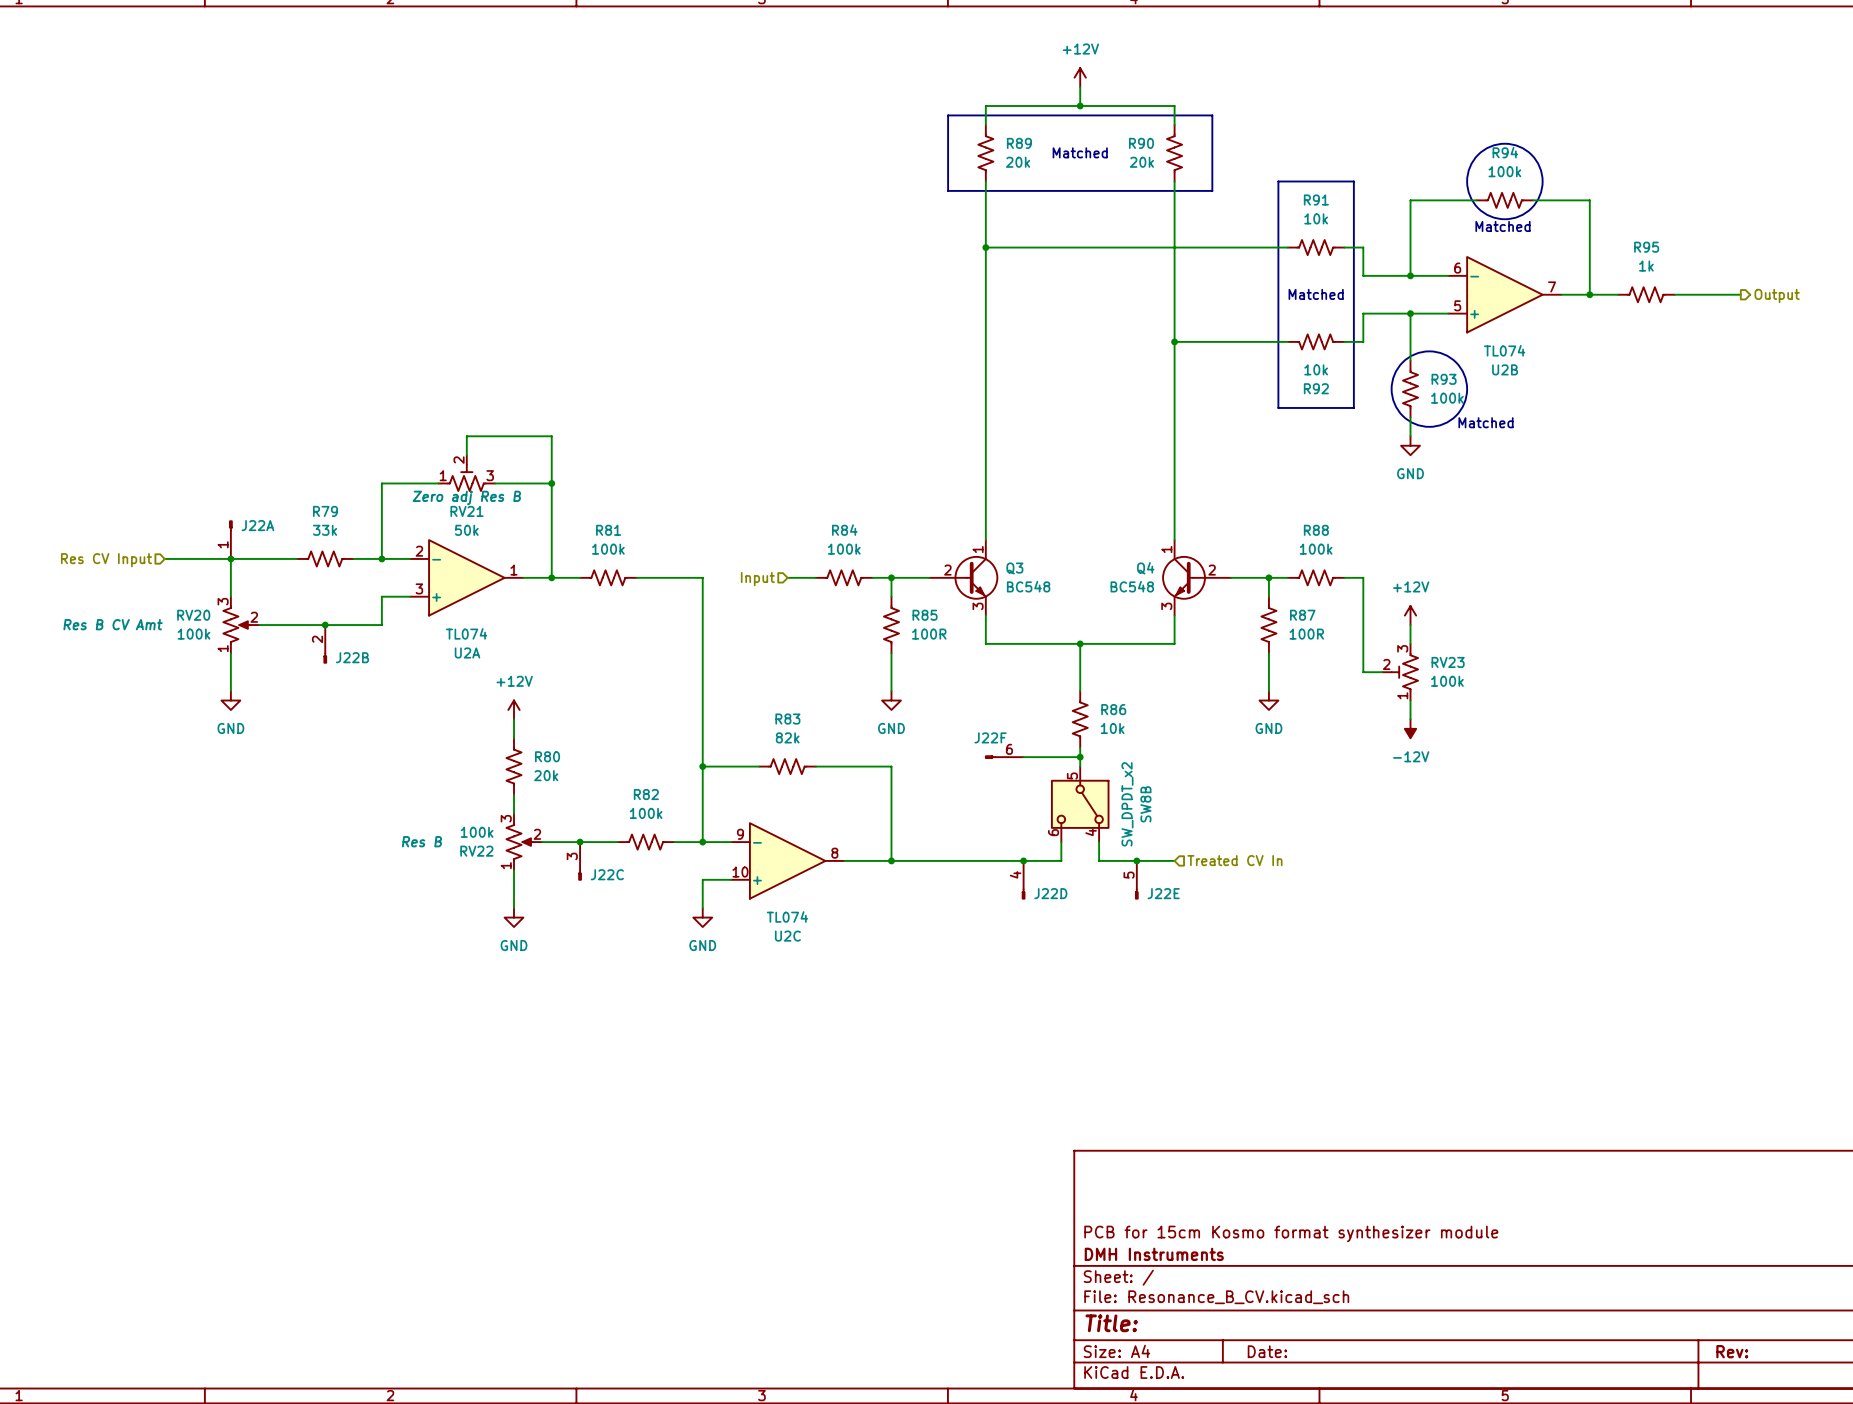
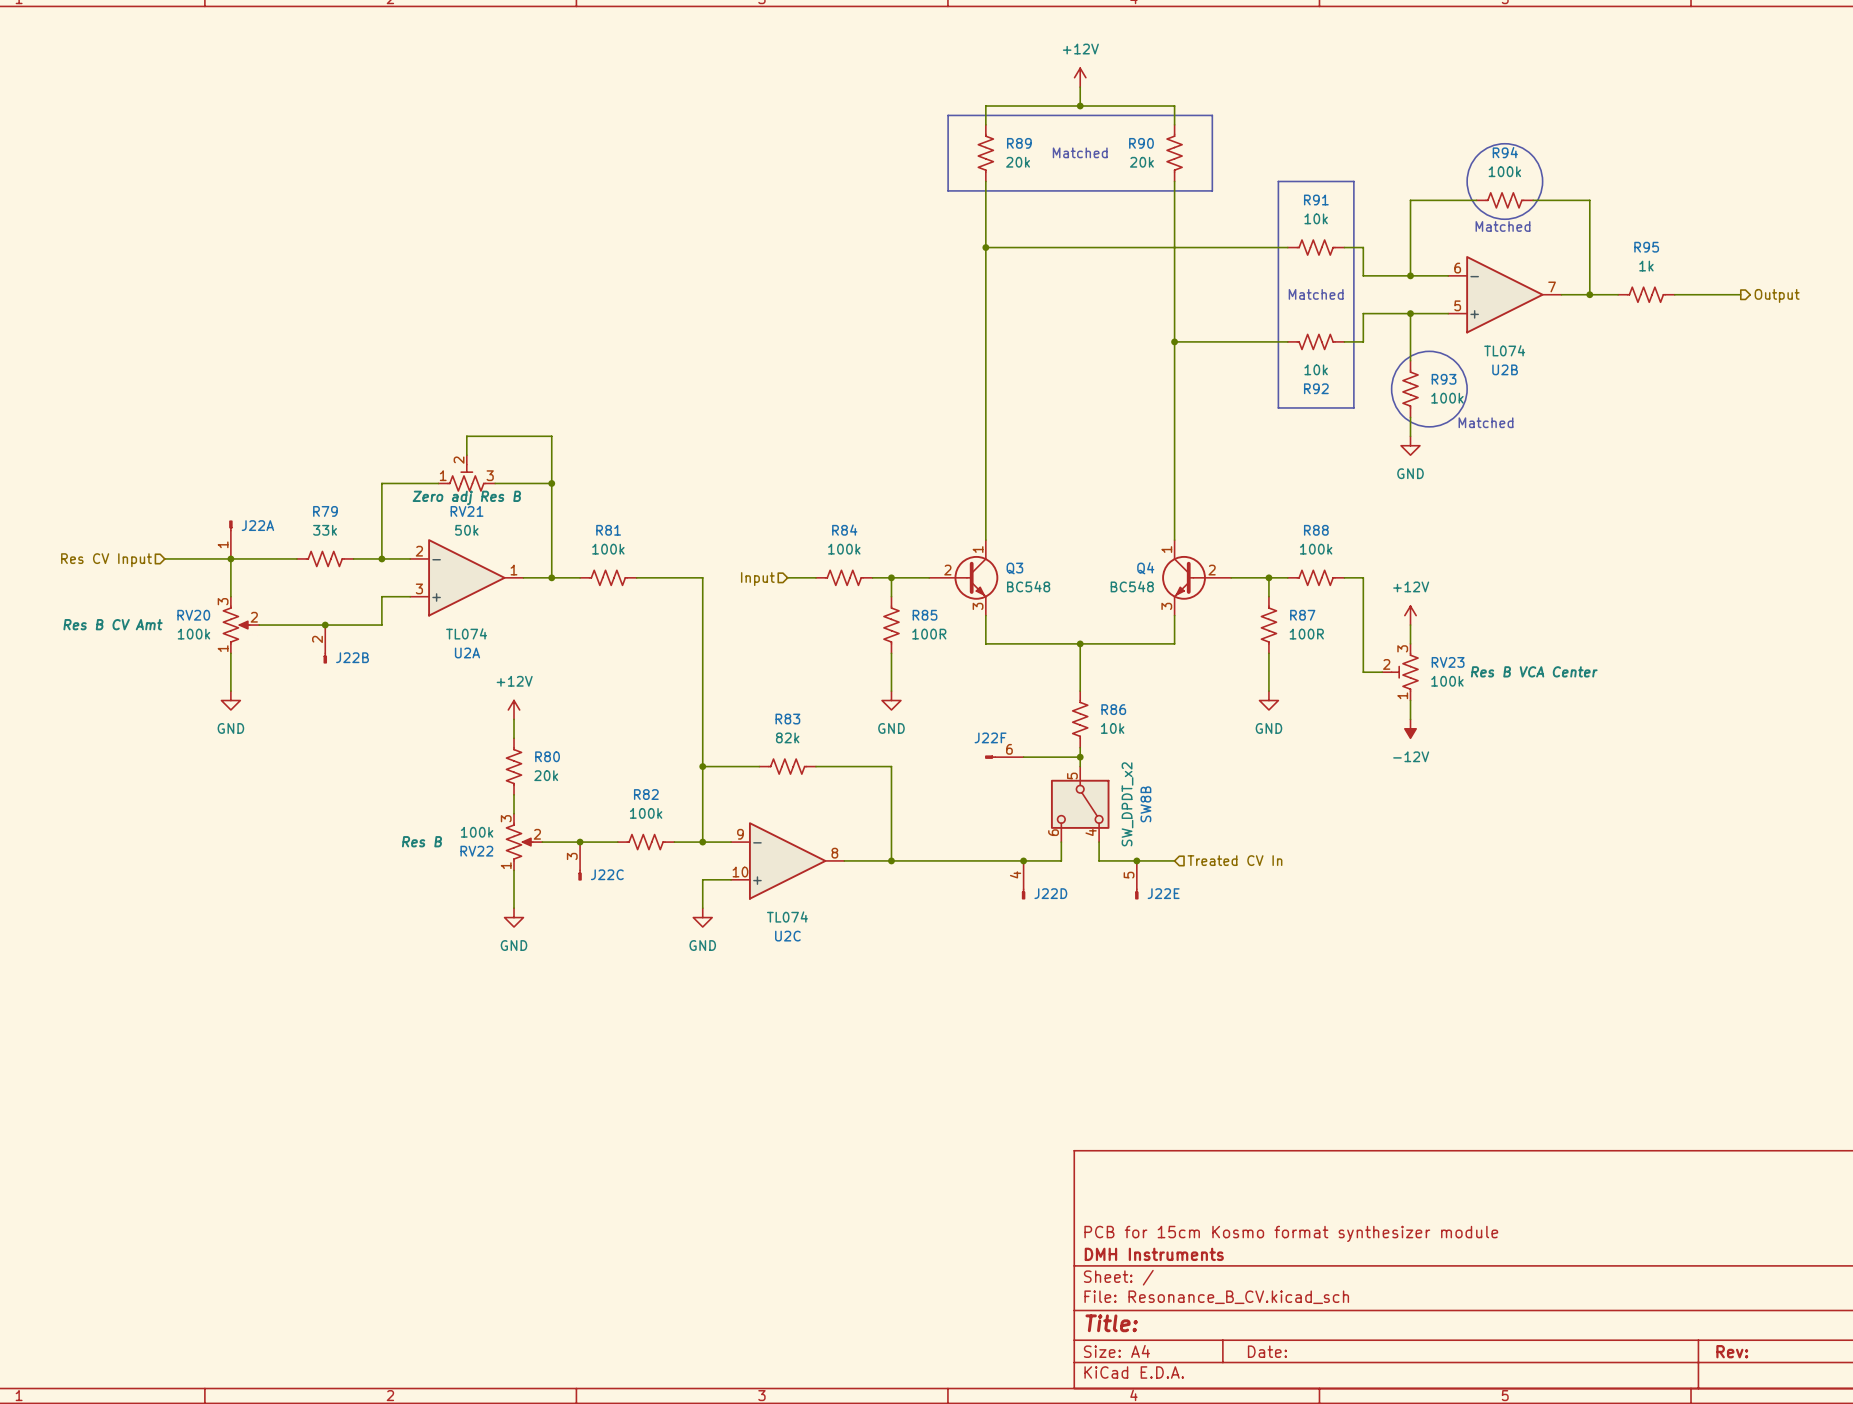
RV23 text: none -> Res B VCA Center (1534, 671)

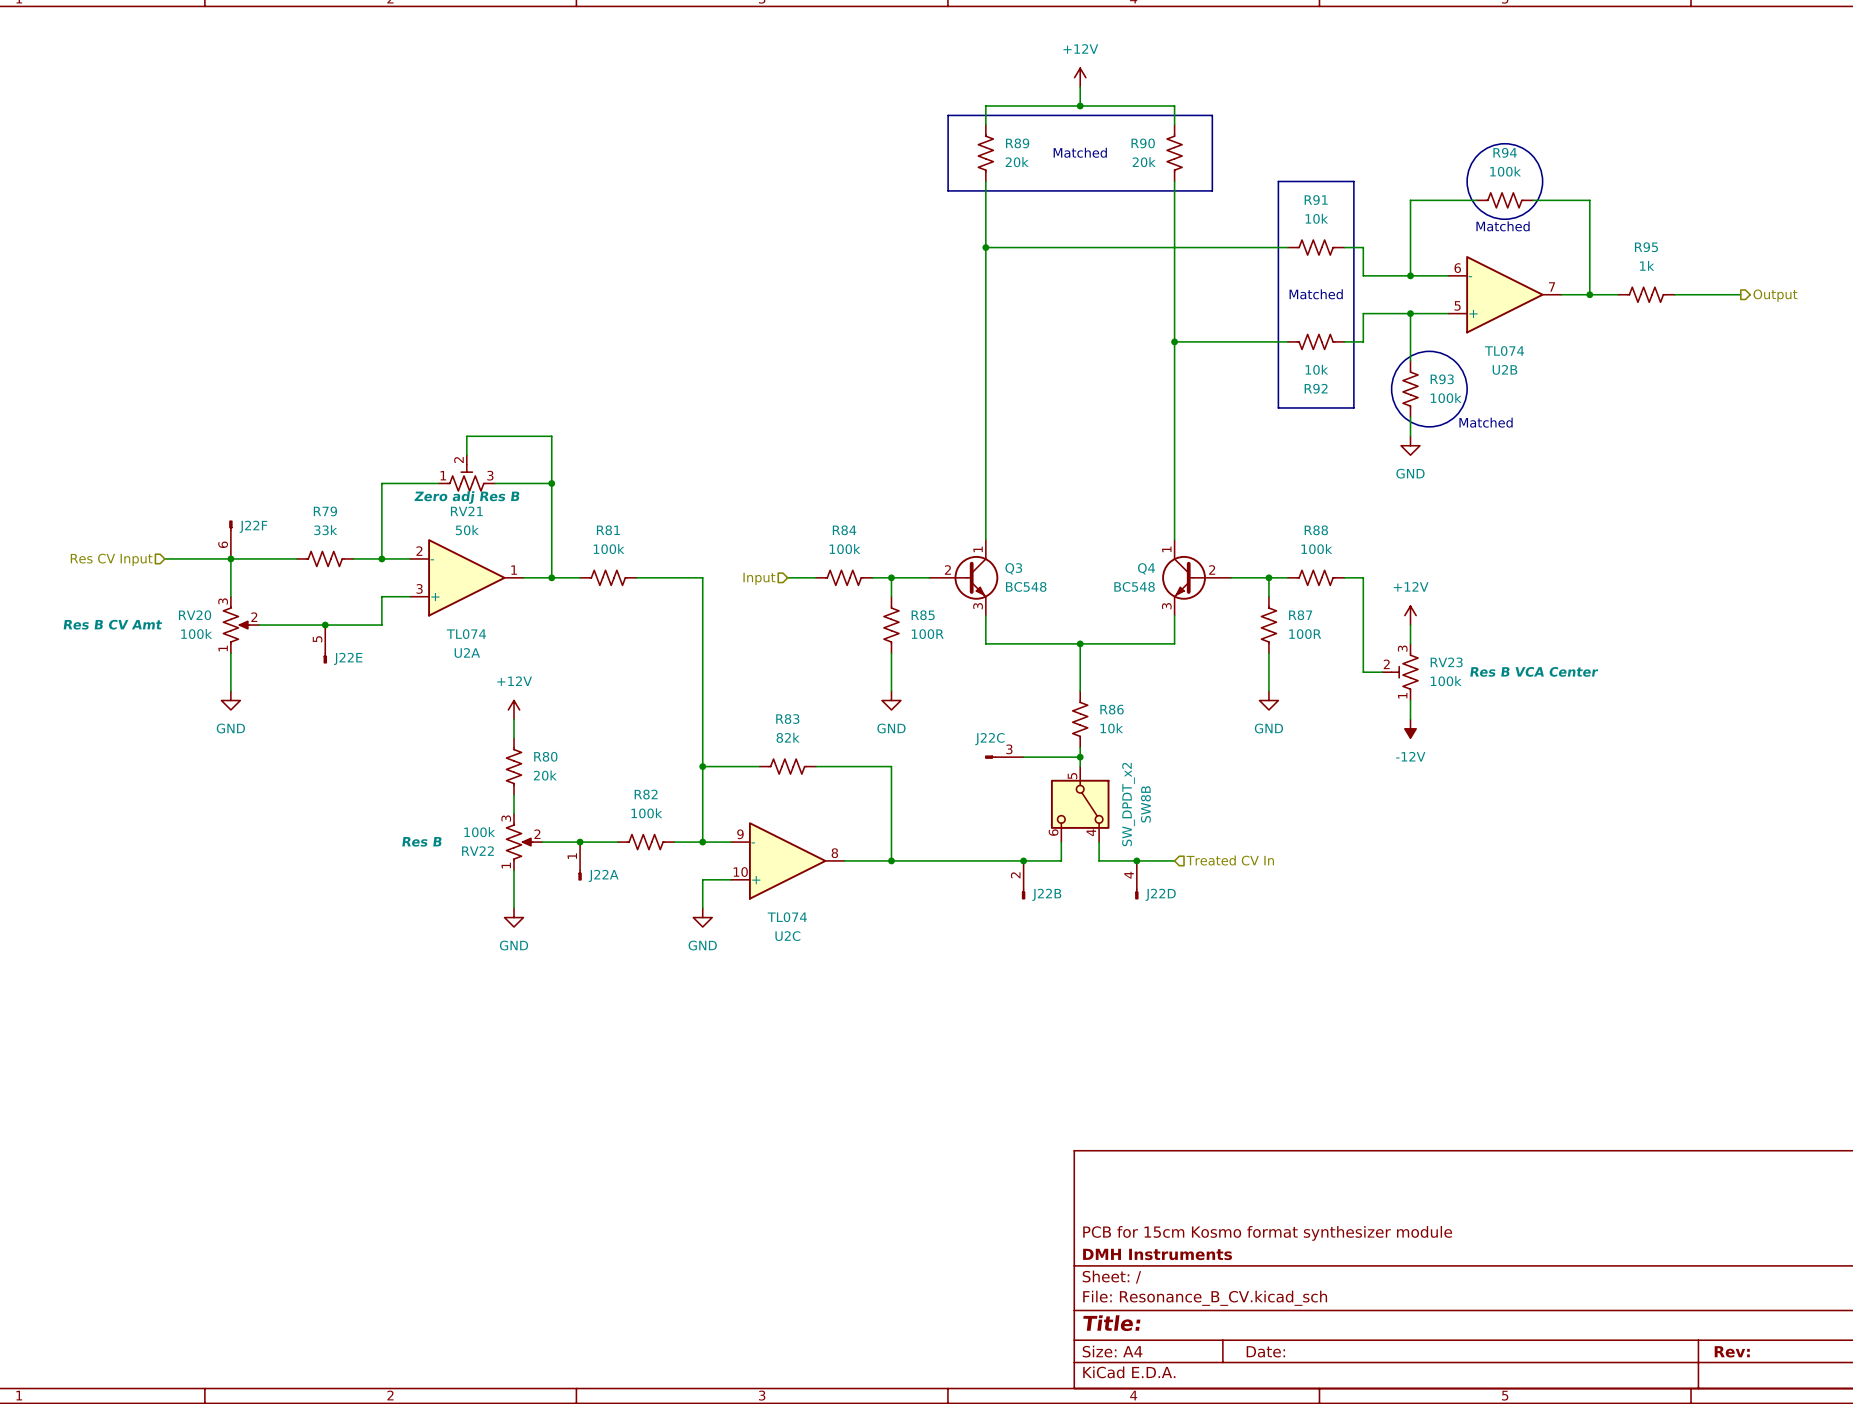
J22A rotation: 0° (230, 525) -> 180° (580, 875)
J22A name position: J22A (257, 525) -> J22A (603, 875)
J22A position: (230, 539) -> (580, 861)
J22B position: (325, 644) -> (1023, 880)
J22F rotation: 0° (990, 757) -> 90° clockwise (230, 525)
J22F position: (1004, 757) -> (230, 539)
J22C position: (580, 861) -> (1004, 757)
J22C name position: J22C (607, 874) -> J22C (989, 739)
J22C rotation: 0° (580, 875) -> 90° clockwise (990, 757)
J22D position: (1023, 880) -> (1136, 880)
J22E position: (1136, 880) -> (325, 644)

